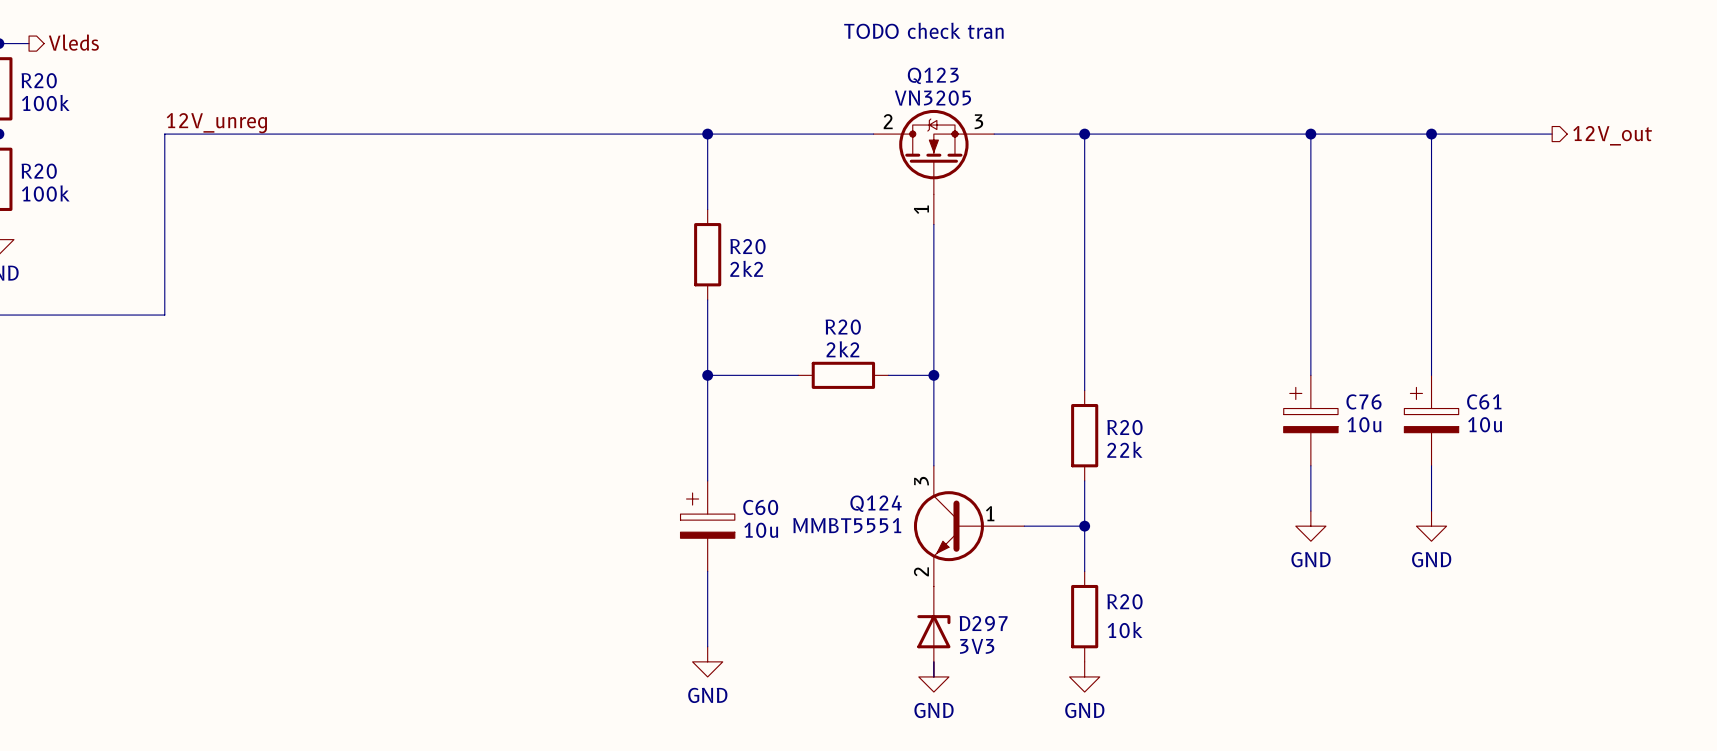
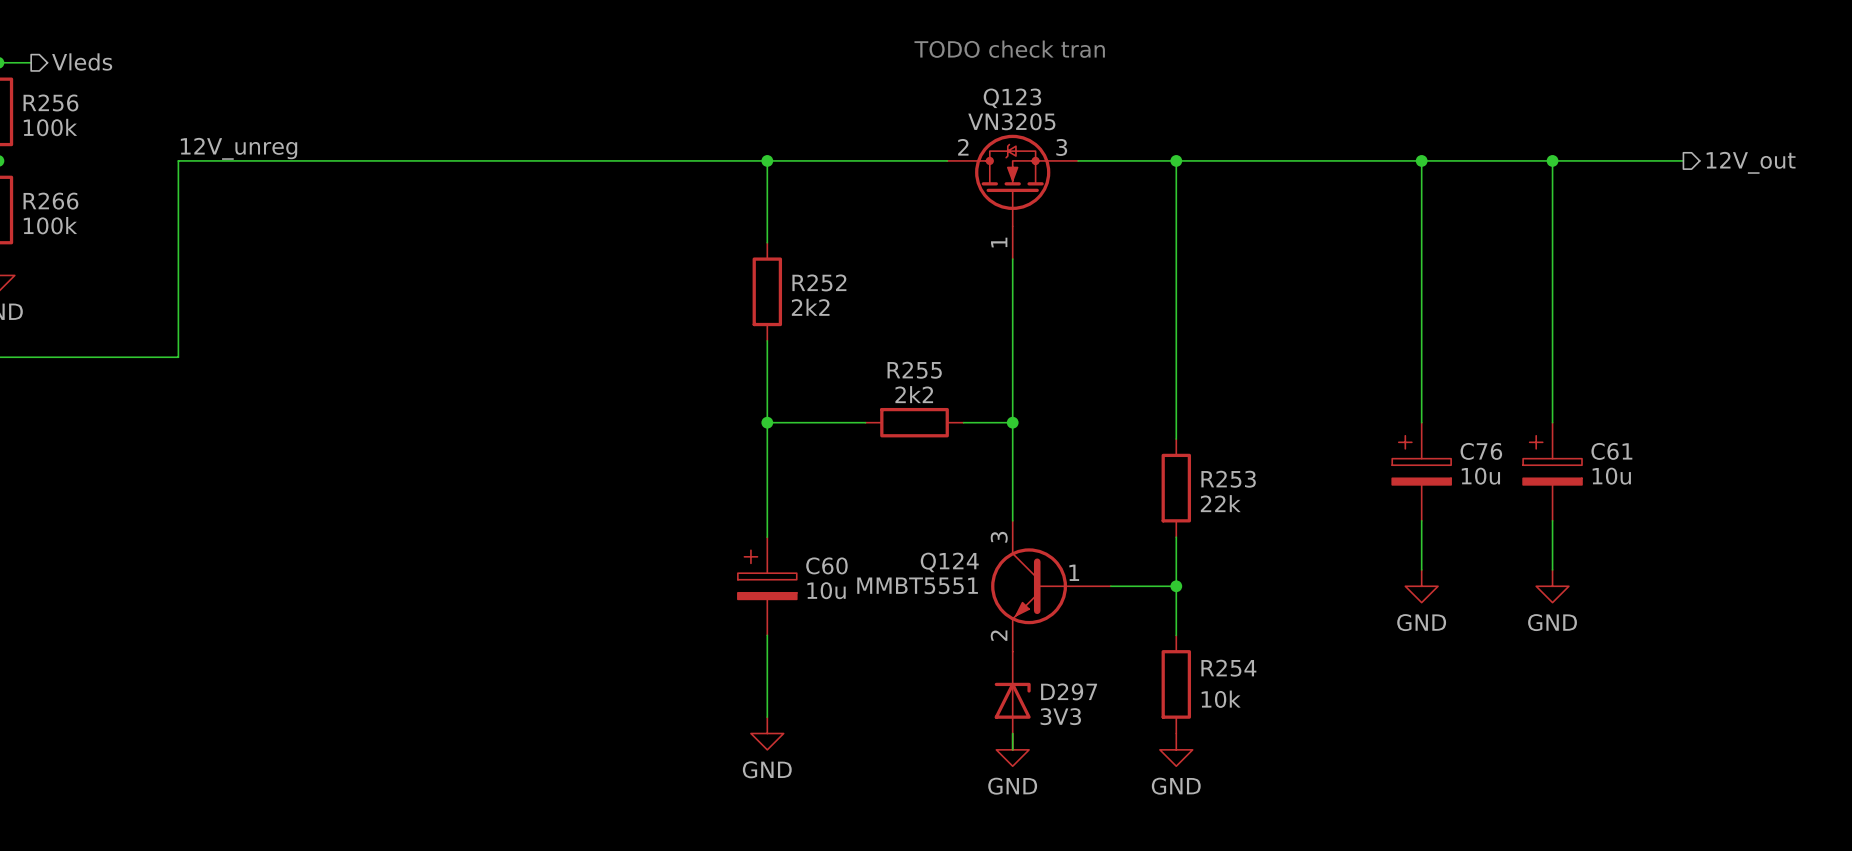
R20 name: R20 (39, 80) -> R256 (50, 102)
R20 name: R20 (39, 171) -> R266 (50, 201)
R20 name: R20 (747, 246) -> R252 (819, 282)
R20 name: R20 (843, 327) -> R255 (914, 370)
R20 name: R20 (1124, 427) -> R253 (1228, 479)
R20 name: R20 (1124, 601) -> R254 (1228, 668)

